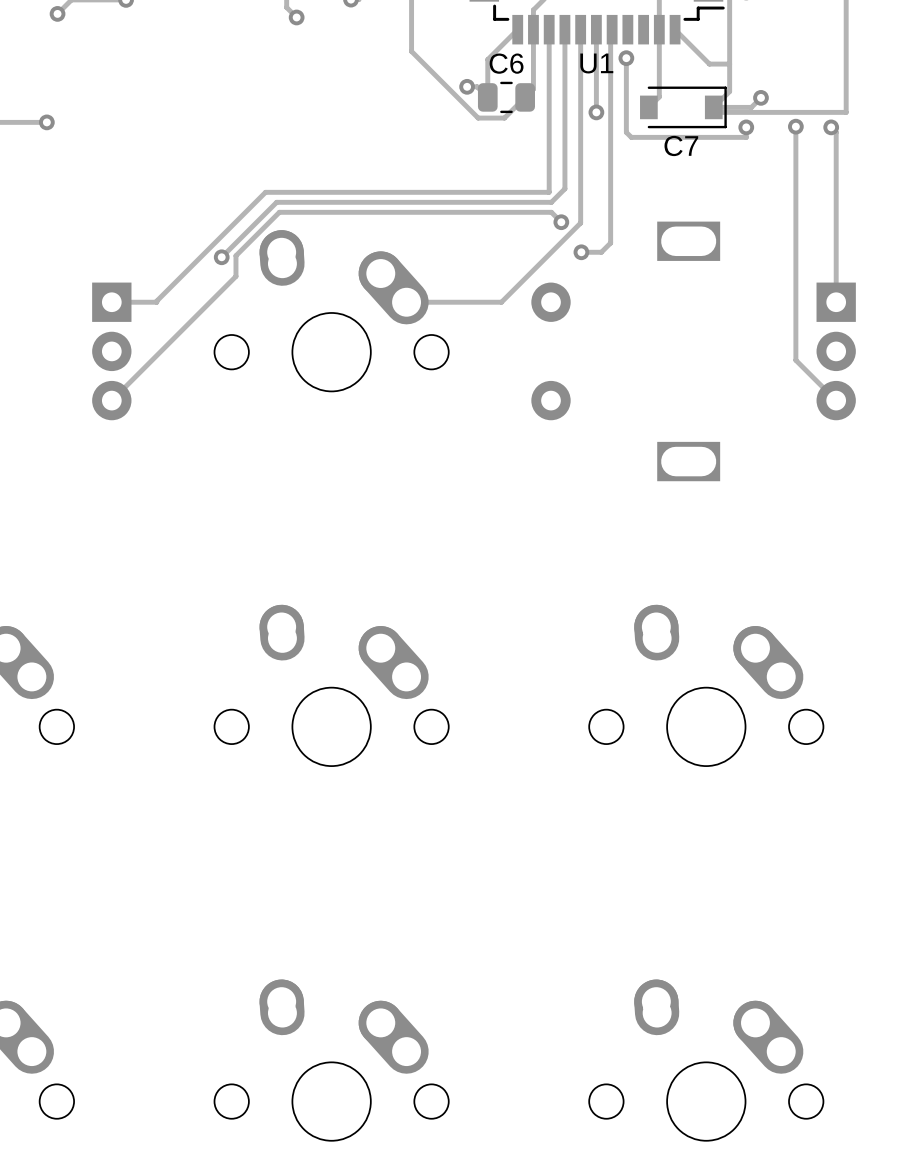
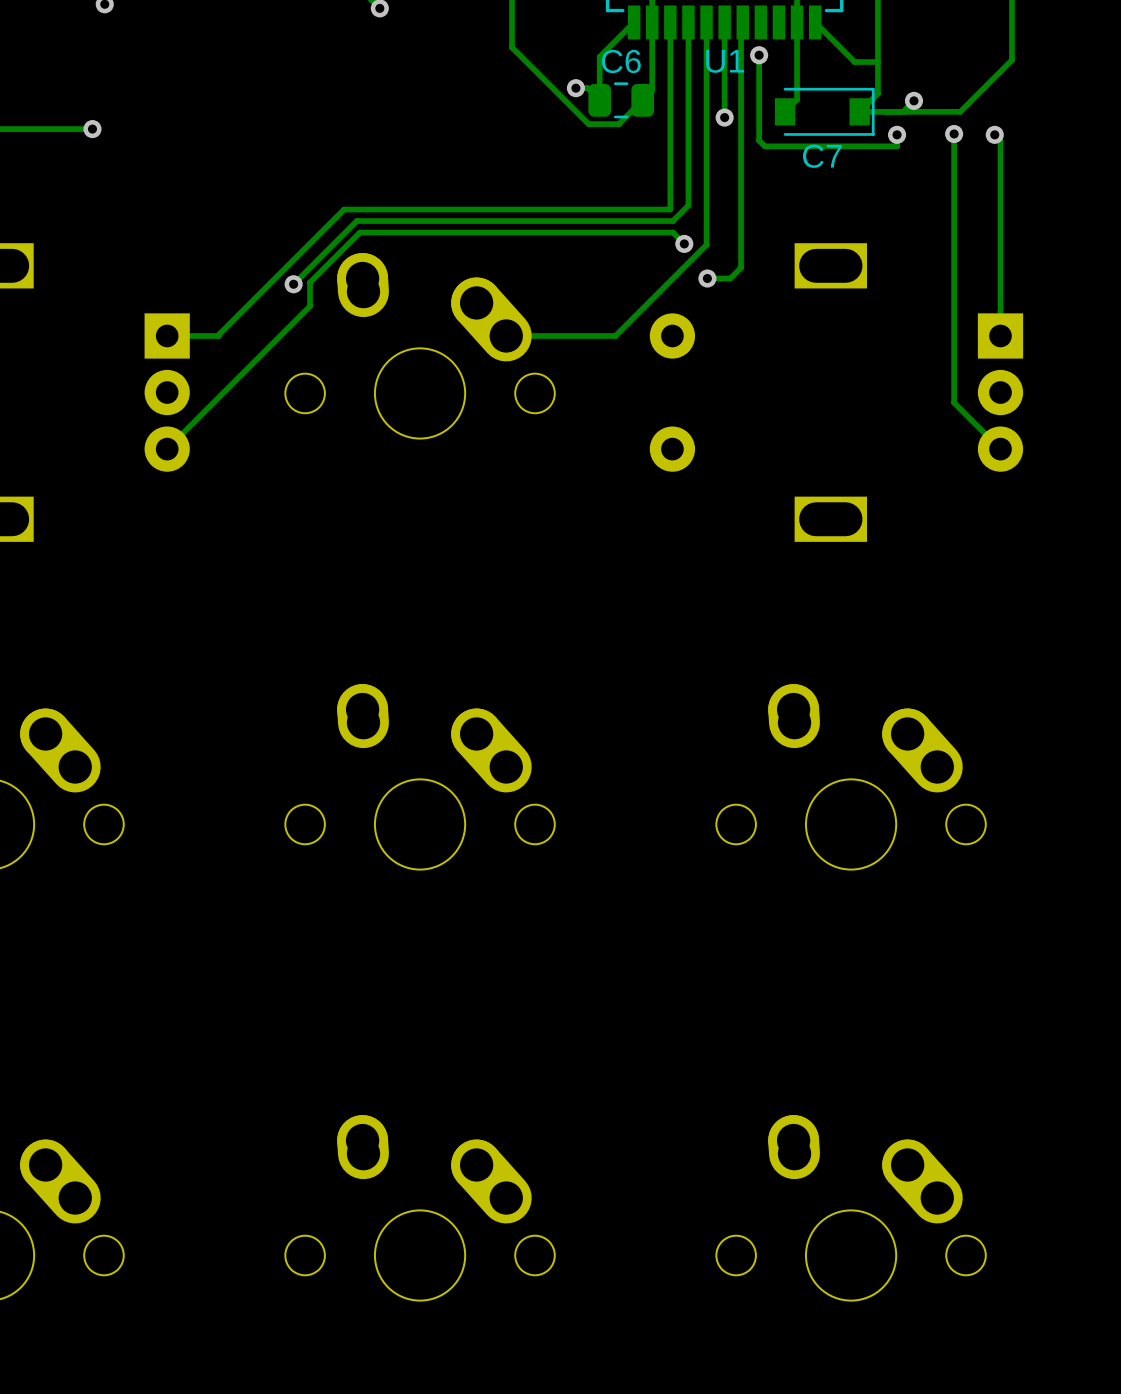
track: (846, 62) (846, 112) (718, 112) -> (1012, 60) (960, 111) (903, 111)

